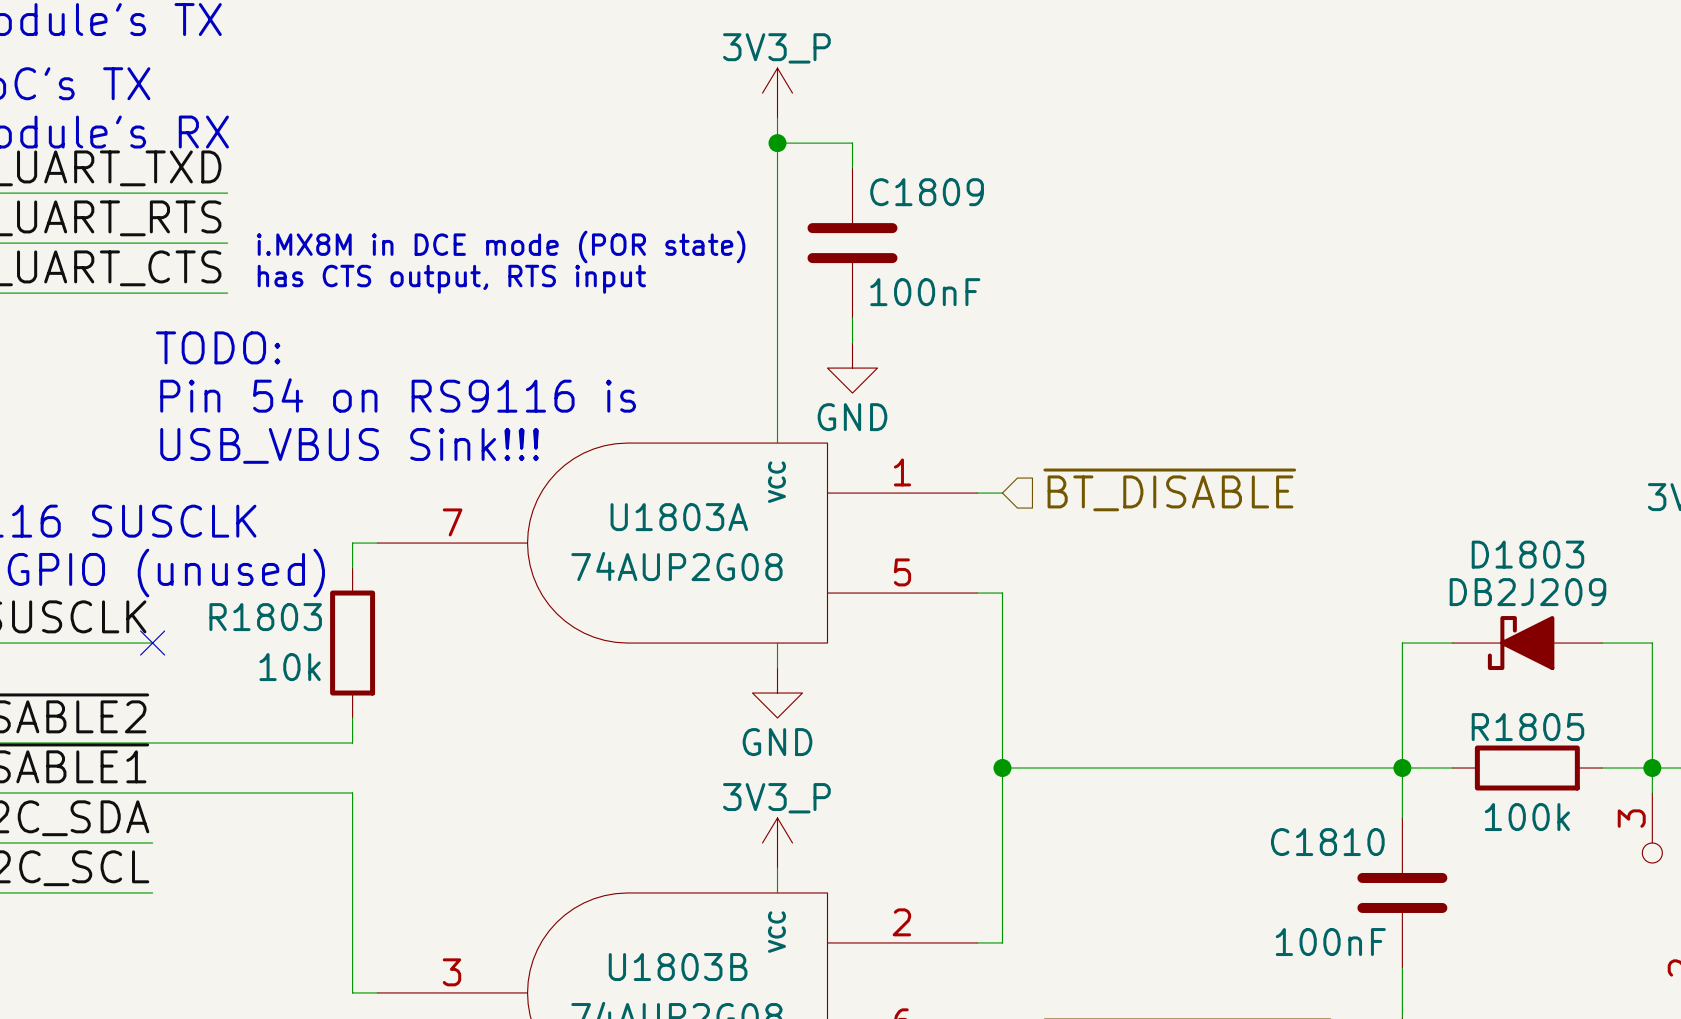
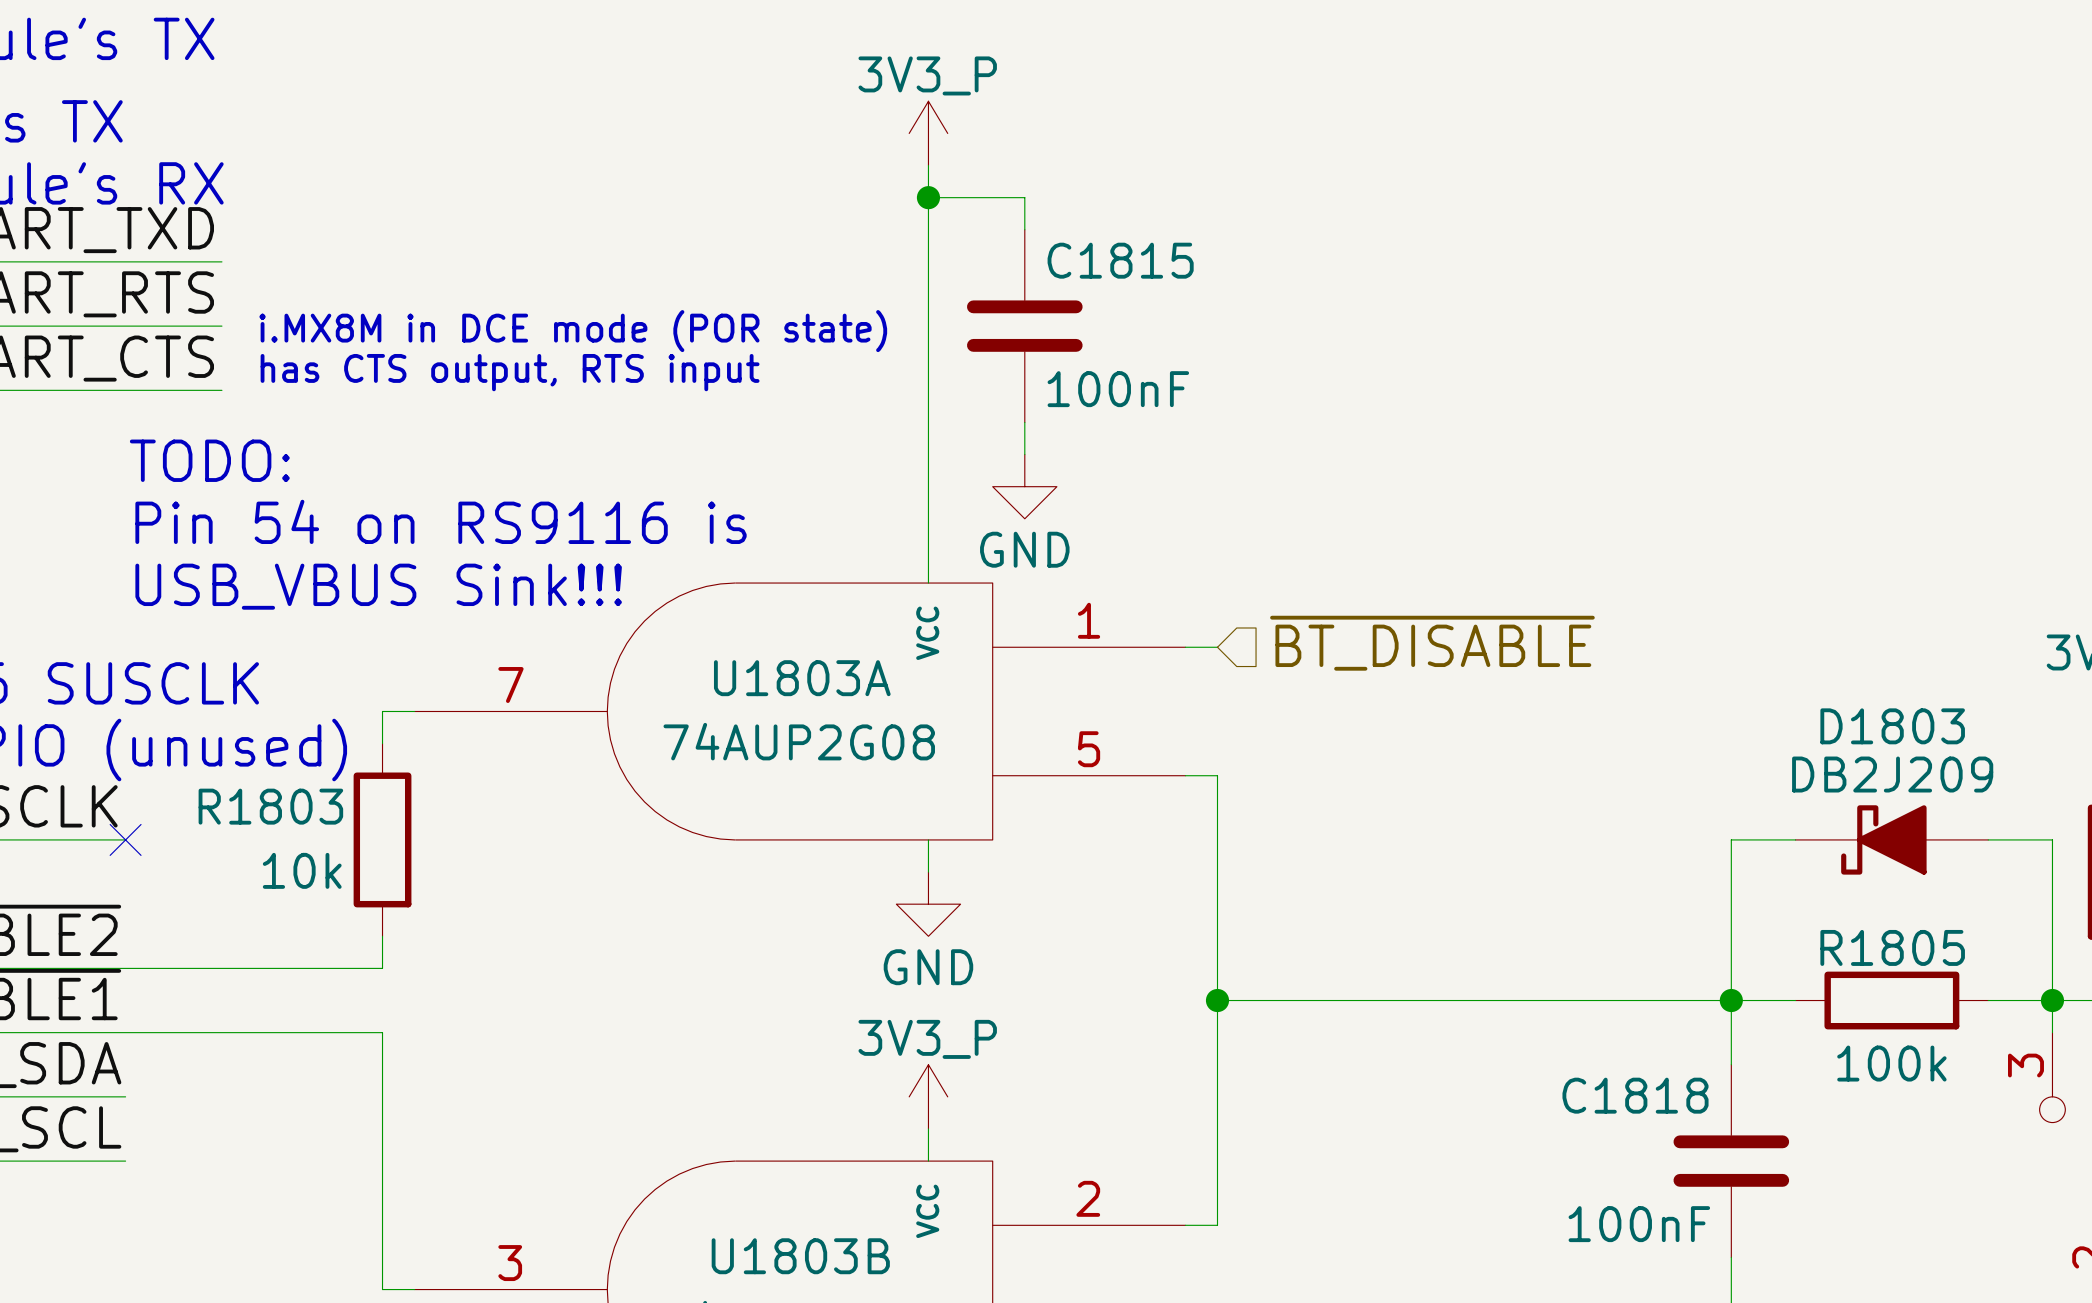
C1809 name: C1809 (927, 192) -> C1815 (1120, 260)
C1810 name: C1810 (1327, 842) -> C1818 (1635, 1095)

